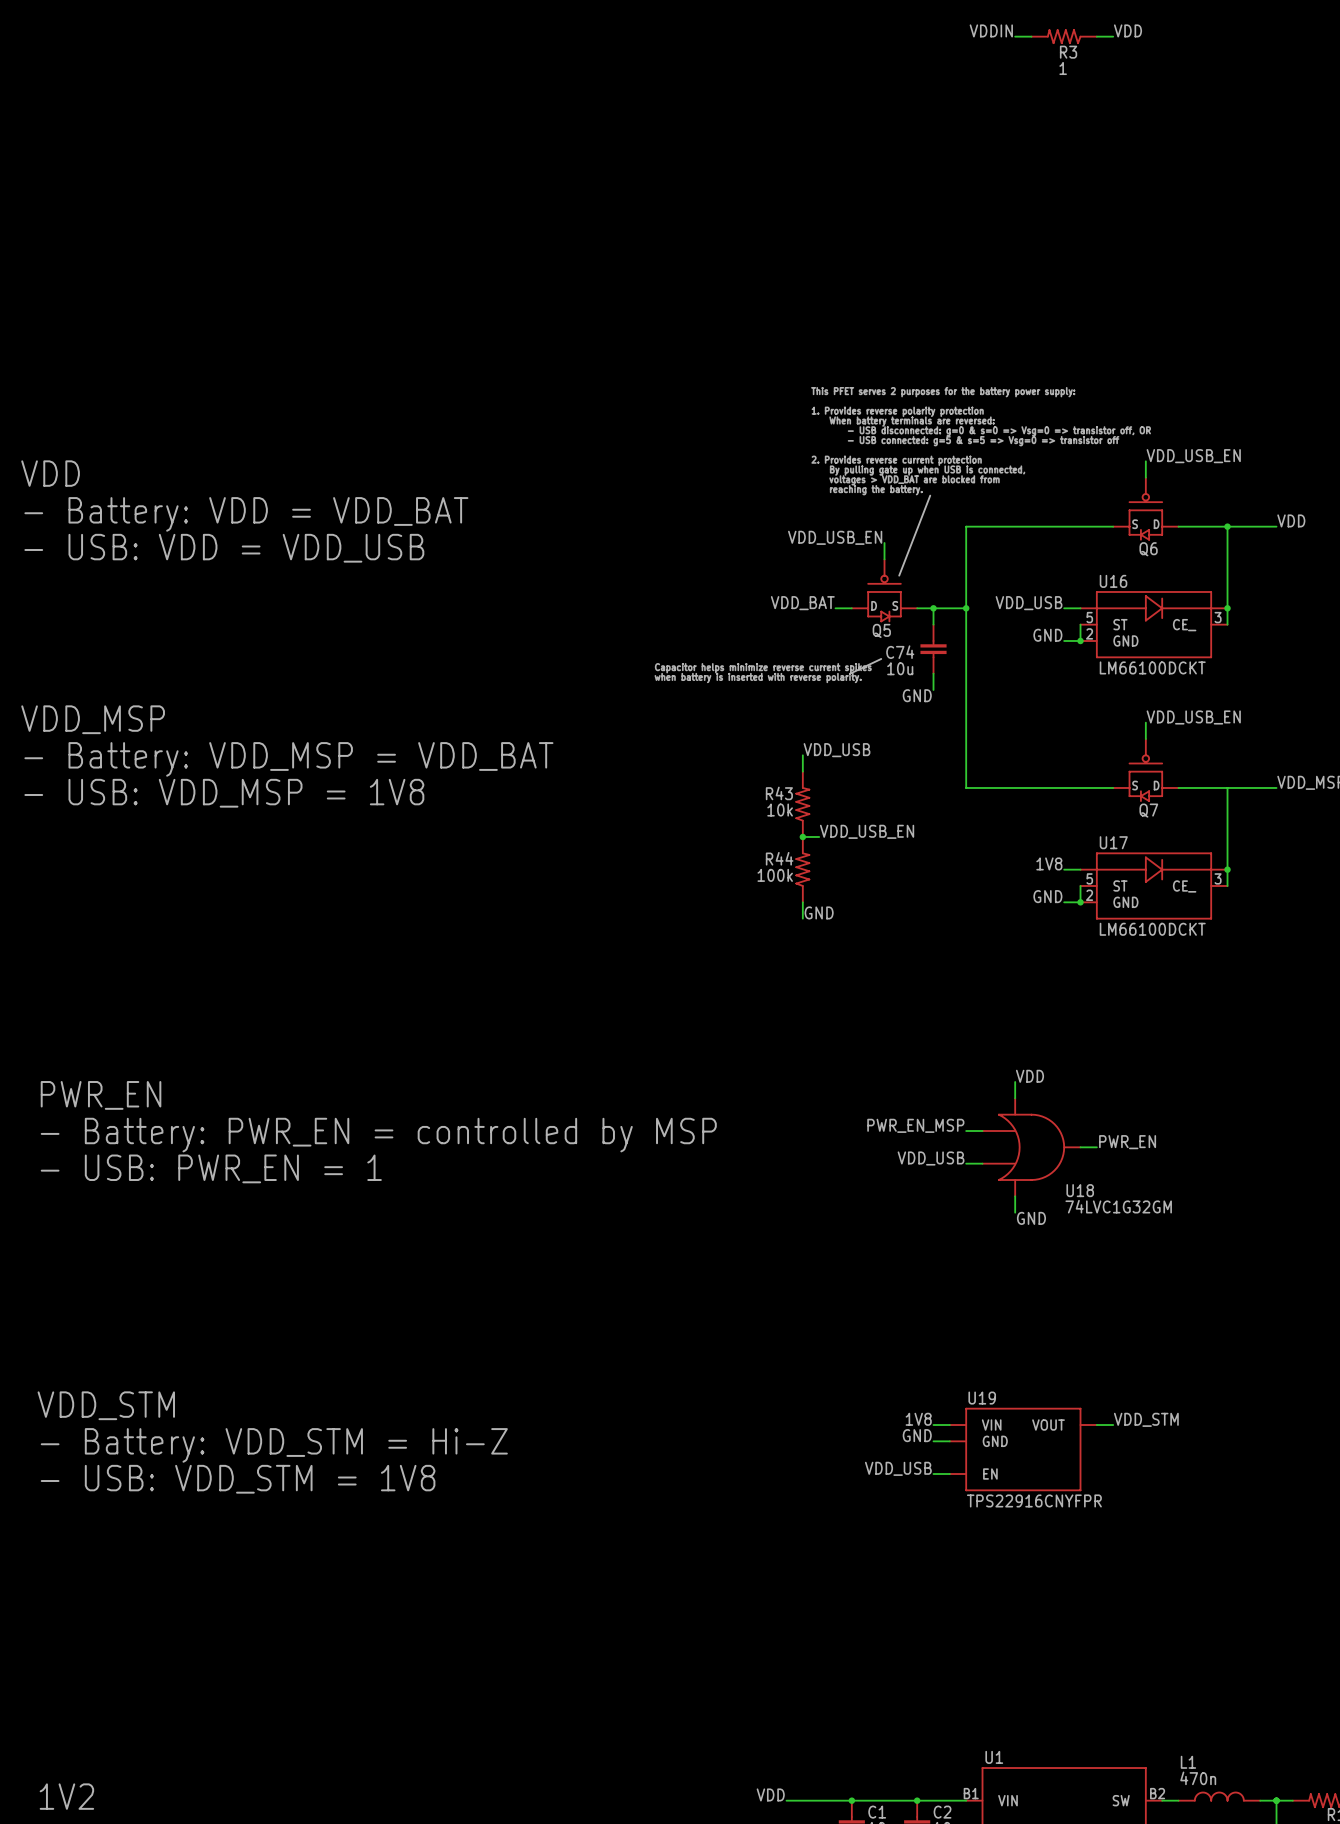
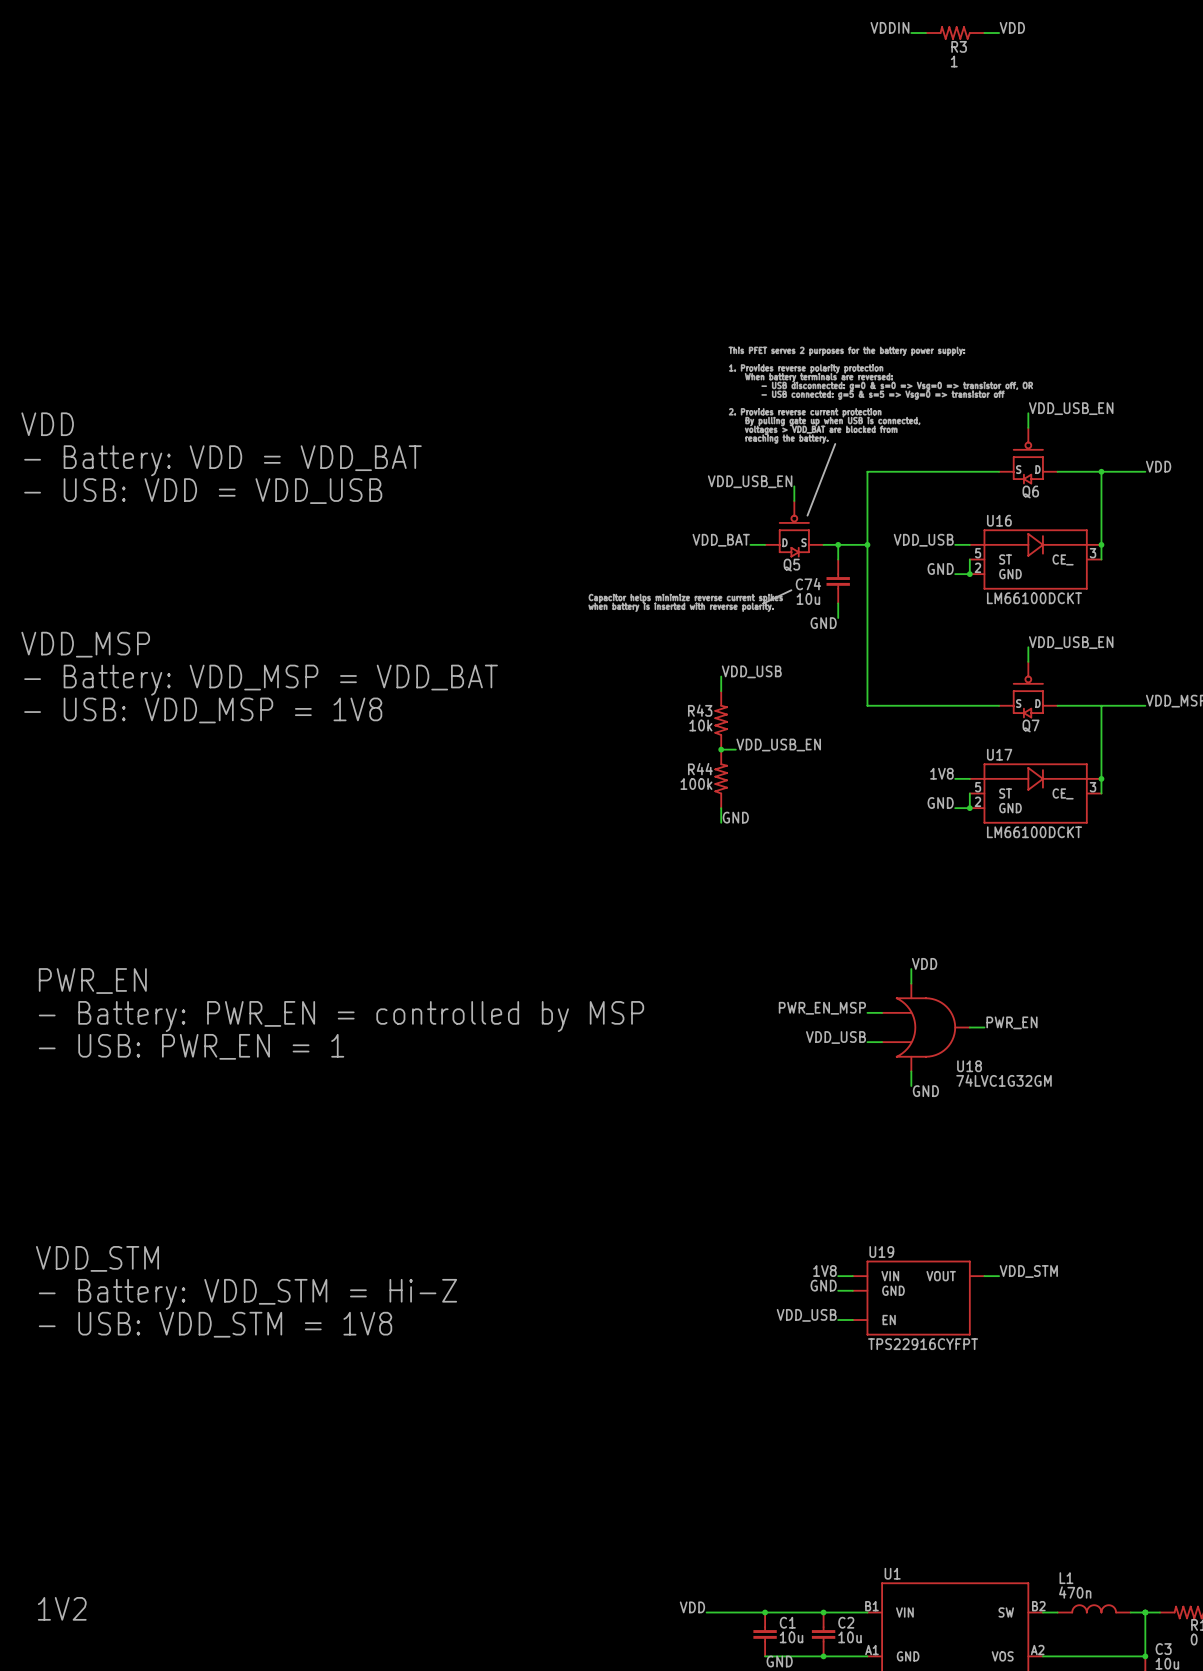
U19 text: TPS22916CNYFPR (1034, 1500) -> TPS22916CYFPT (923, 1344)

